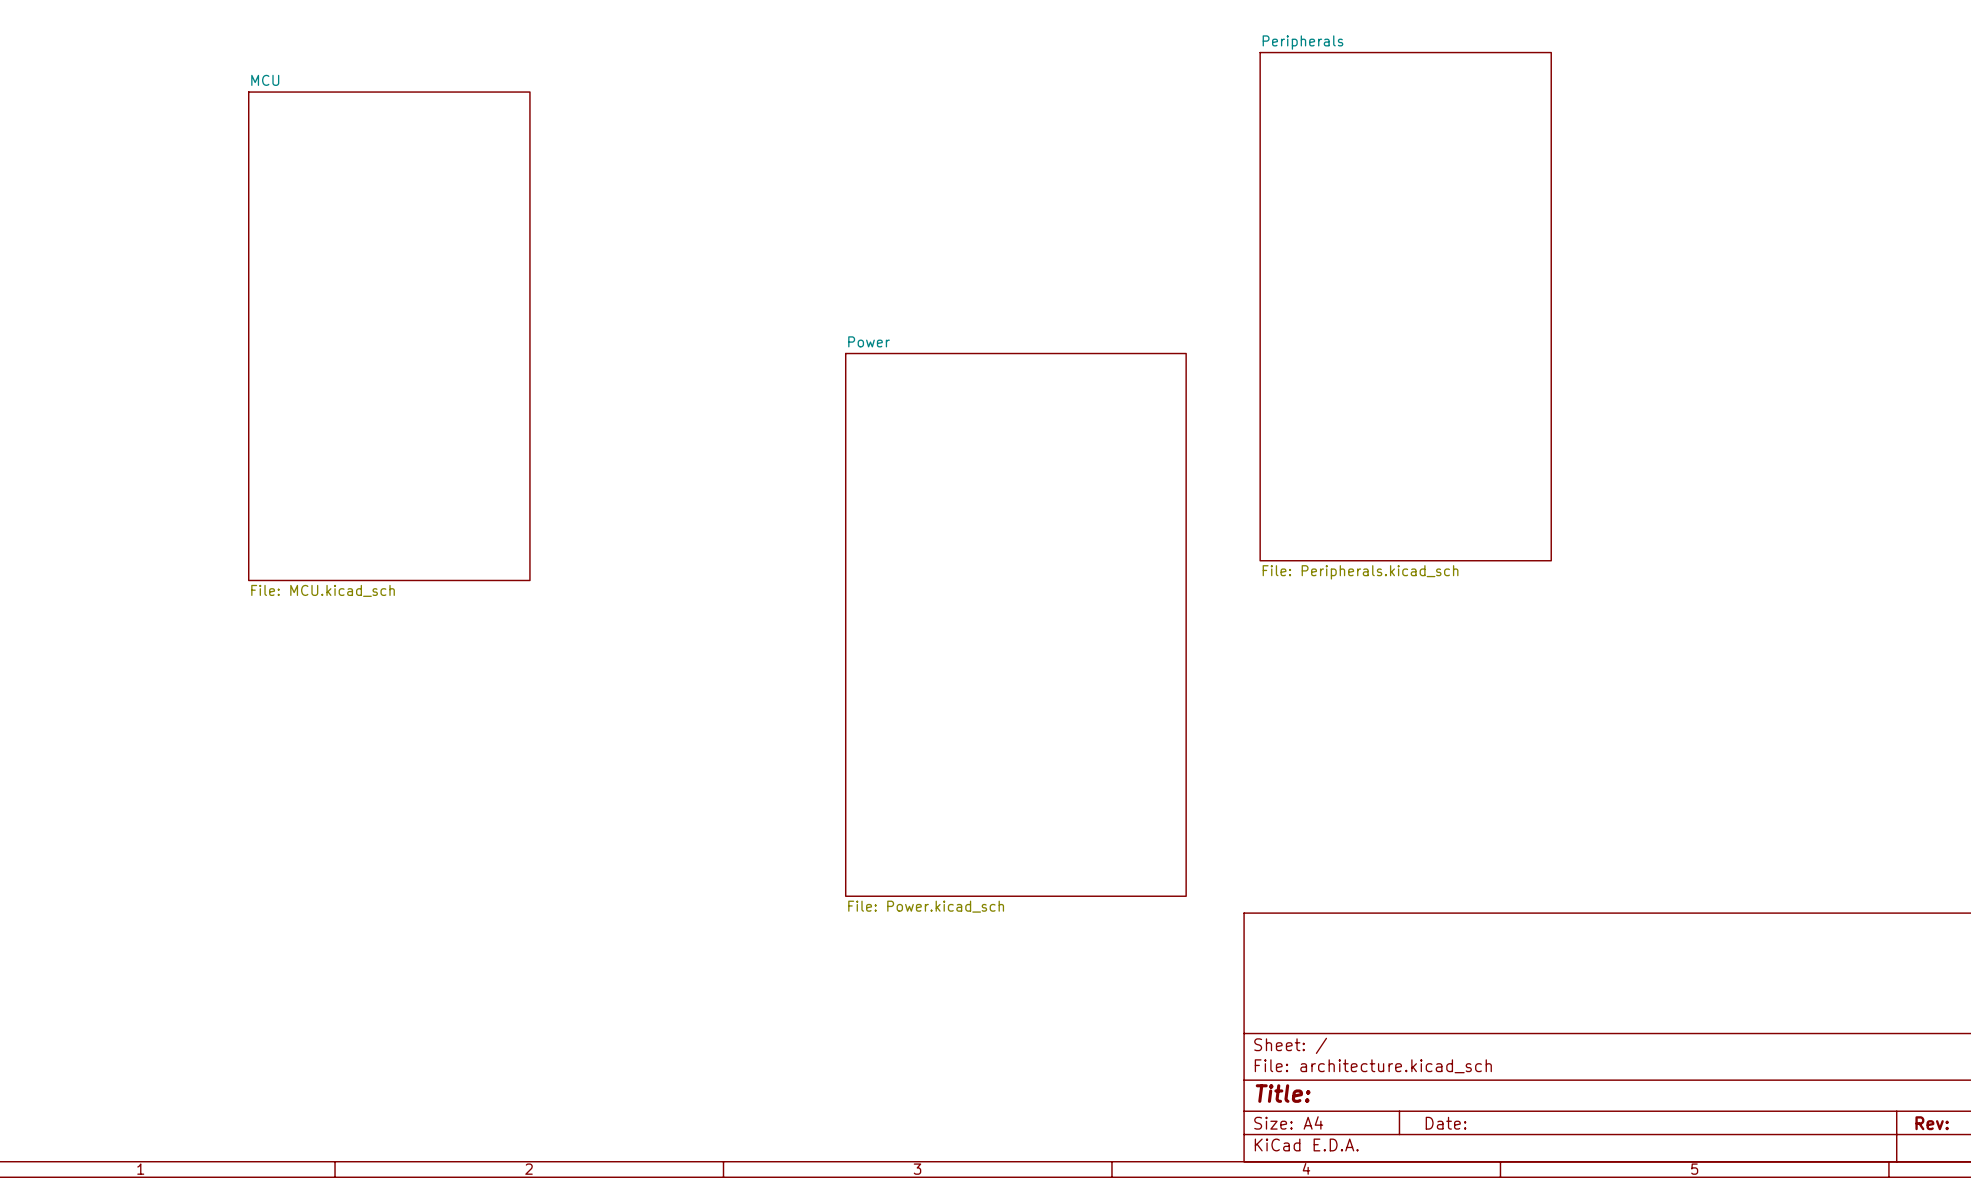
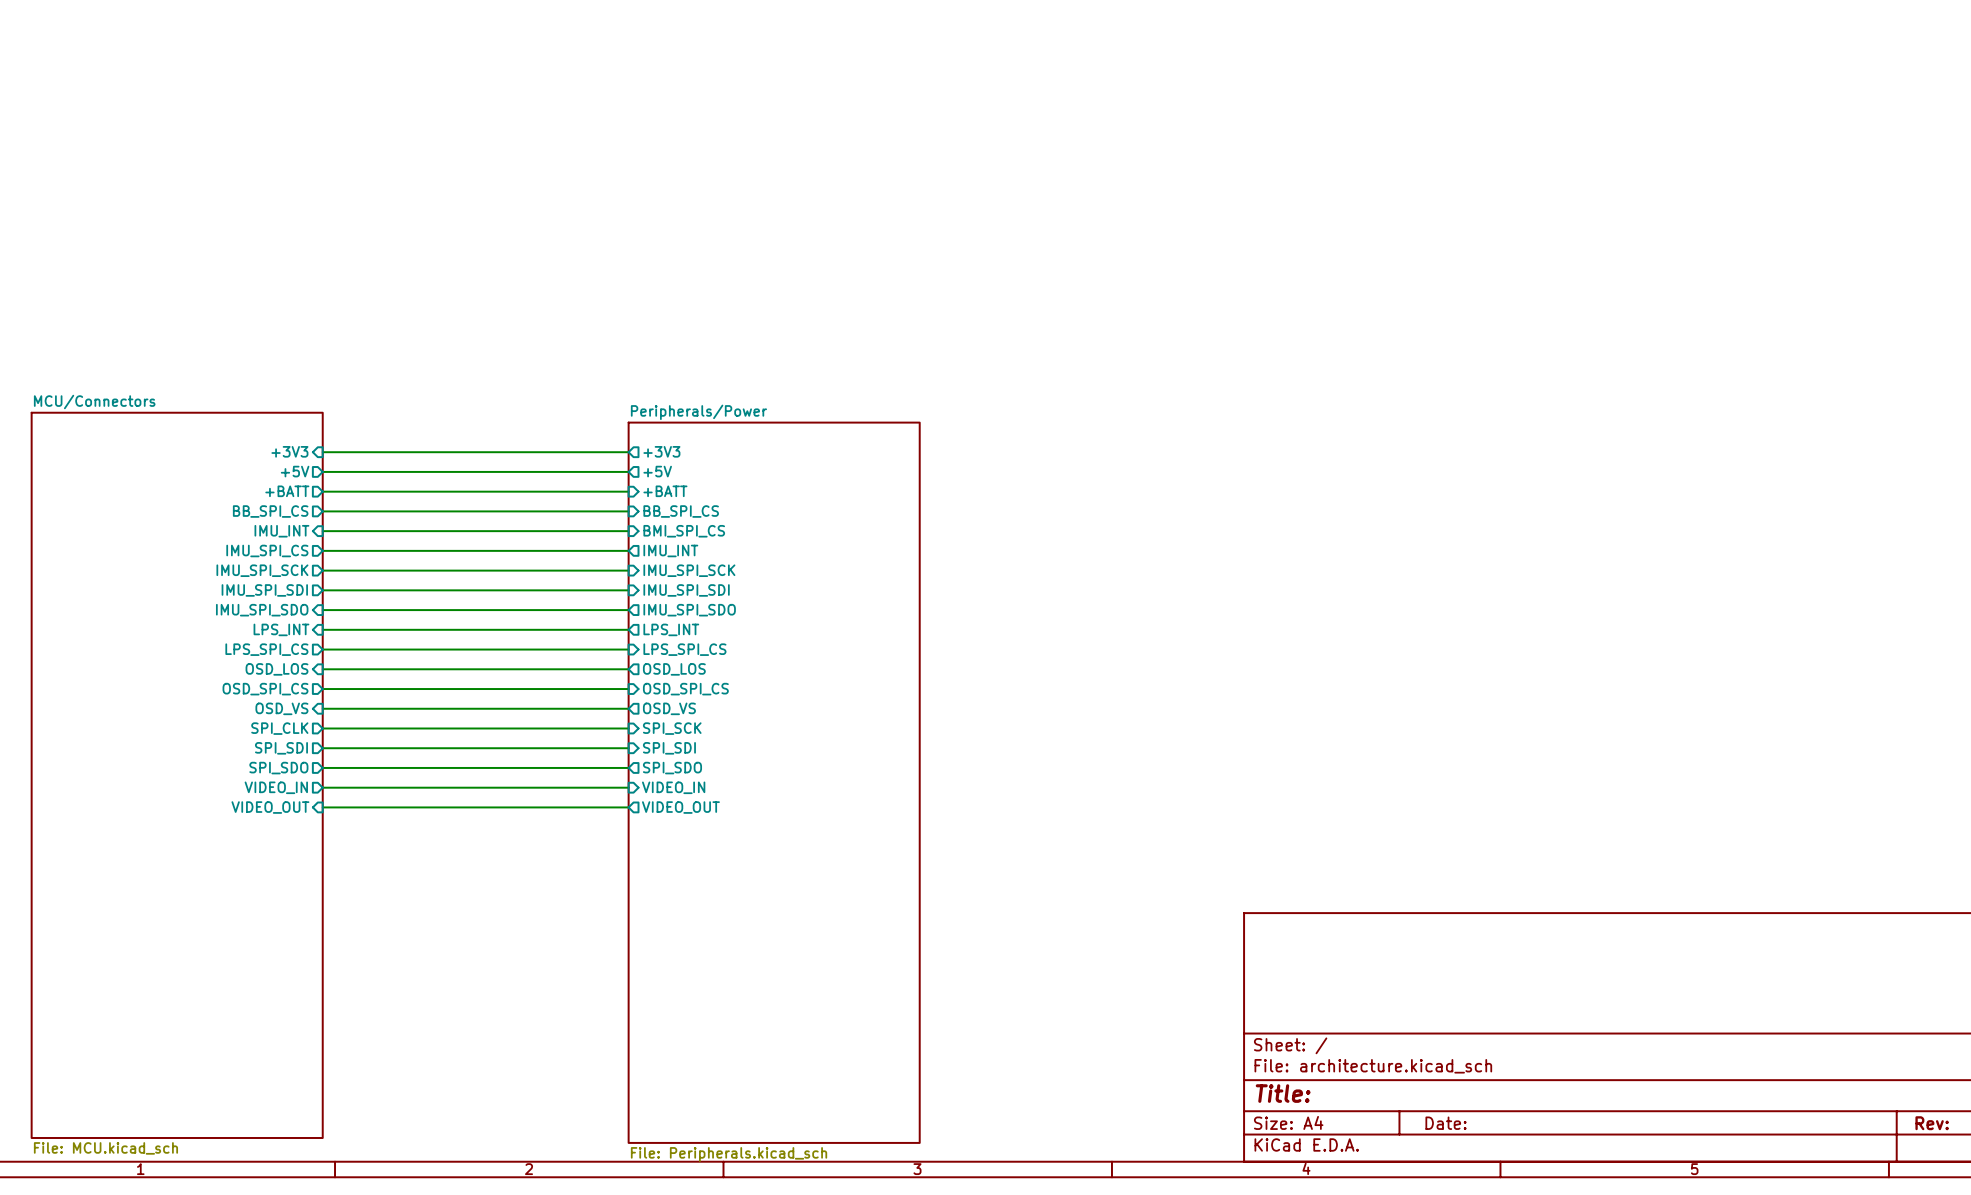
sheet Peripherals: File: Peripherals.kicad_sch (1405, 306) -> none
sheet MCU: File: MCU.kicad_sch (389, 336) -> none
sheet pin: none -> +3V3 (289, 451)
sheet pin: none -> +3V3 (661, 451)
wire: none -> (322, 452) (628, 452)
sheet pin: none -> +5V (295, 471)
wire: none -> (322, 471) (628, 471)
sheet pin: none -> +5V (657, 471)
sheet pin: none -> +BATT (287, 491)
wire: none -> (322, 491) (628, 491)
sheet pin: none -> +BATT (665, 491)
sheet pin: none -> BB_SPI_CS (270, 511)
wire: none -> (322, 511) (628, 511)
sheet pin: none -> BB_SPI_CS (681, 511)
sheet pin: none -> IMU_INT (281, 531)
wire: none -> (322, 531) (628, 531)
sheet pin: none -> BMI_SPI_CS (684, 531)
sheet pin: none -> IMU_SPI_CS (267, 550)
wire: none -> (322, 550) (628, 550)
sheet pin: none -> IMU_INT (670, 550)
sheet pin: none -> IMU_SPI_SCK (262, 570)
wire: none -> (322, 570) (628, 570)
sheet pin: none -> IMU_SPI_SCK (689, 570)
sheet pin: none -> IMU_SPI_SDI (264, 590)
wire: none -> (322, 590) (628, 590)
sheet pin: none -> IMU_SPI_SDI (686, 590)
sheet pin: none -> IMU_SPI_SDO (262, 610)
wire: none -> (322, 610) (628, 610)
sheet pin: none -> IMU_SPI_SDO (689, 610)
sheet Power: File: Power.kicad_sch (1015, 624) -> none
sheet pin: none -> LPS_INT (281, 629)
wire: none -> (322, 629) (628, 629)
sheet pin: none -> LPS_INT (671, 629)
sheet pin: none -> LPS_SPI_CS (266, 649)
wire: none -> (322, 649) (628, 649)
sheet pin: none -> LPS_SPI_CS (684, 649)
sheet pin: none -> OSD_LOS (277, 669)
wire: none -> (322, 669) (628, 669)
sheet pin: none -> OSD_LOS (674, 669)
sheet pin: none -> OSD_SPI_CS (265, 689)
wire: none -> (322, 689) (628, 689)
sheet pin: none -> OSD_SPI_CS (685, 689)
sheet pin: none -> OSD_VS (281, 708)
wire: none -> (322, 708) (628, 708)
sheet pin: none -> OSD_VS (669, 708)
sheet pin: none -> SPI_CLK (279, 728)
wire: none -> (322, 728) (628, 728)
sheet pin: none -> SPI_SCK (672, 728)
sheet pin: none -> SPI_SDI (281, 748)
wire: none -> (322, 748) (628, 748)
sheet pin: none -> SPI_SDI (669, 748)
wire: none -> (322, 767) (628, 767)
sheet pin: none -> SPI_SDO (278, 768)
sheet pin: none -> SPI_SDO (672, 768)
sheet MCU/Connectors: none -> File: MCU.kicad_sch (177, 775)
sheet Peripherals/Power: none -> File: Peripherals.kicad_sch (774, 782)
sheet pin: none -> VIDEO_IN (276, 787)
wire: none -> (322, 787) (628, 787)
sheet pin: none -> VIDEO_IN (673, 787)
sheet pin: none -> VIDEO_OUT (270, 807)
wire: none -> (322, 807) (628, 807)
sheet pin: none -> VIDEO_OUT (680, 807)

